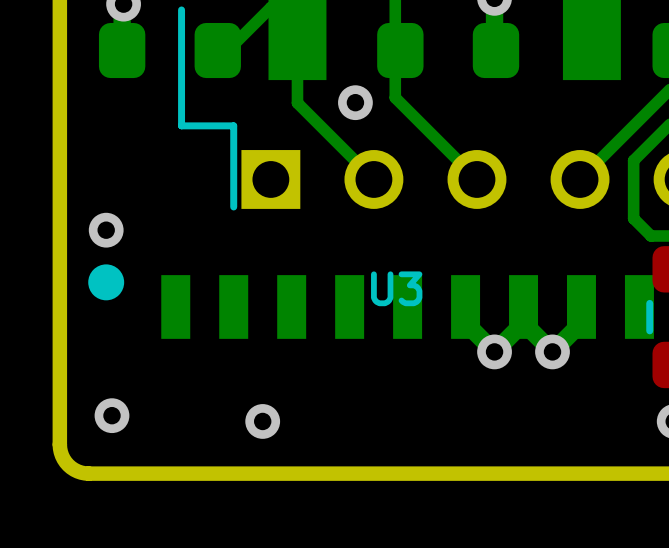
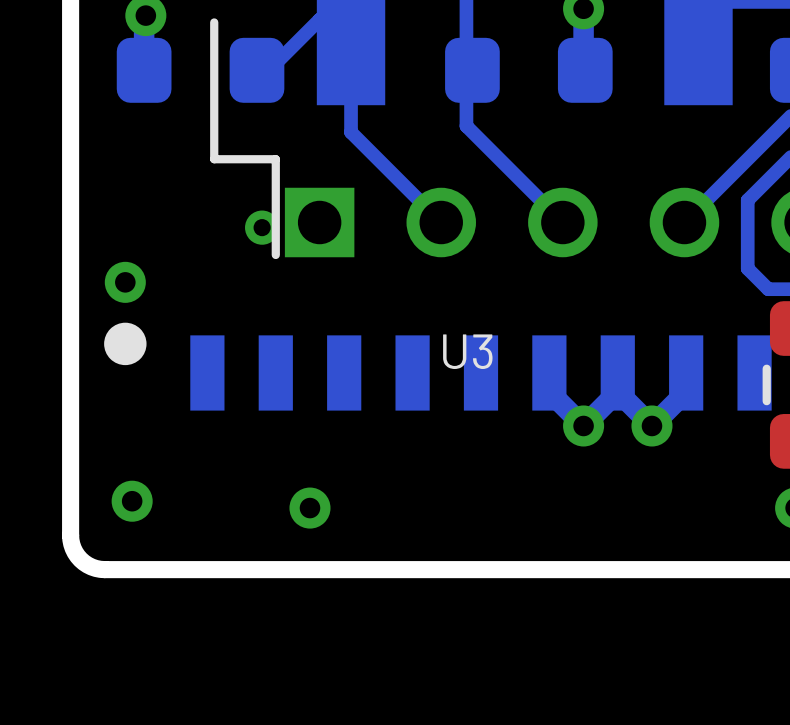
via: (355, 102) -> none
via: none -> (262, 227)

